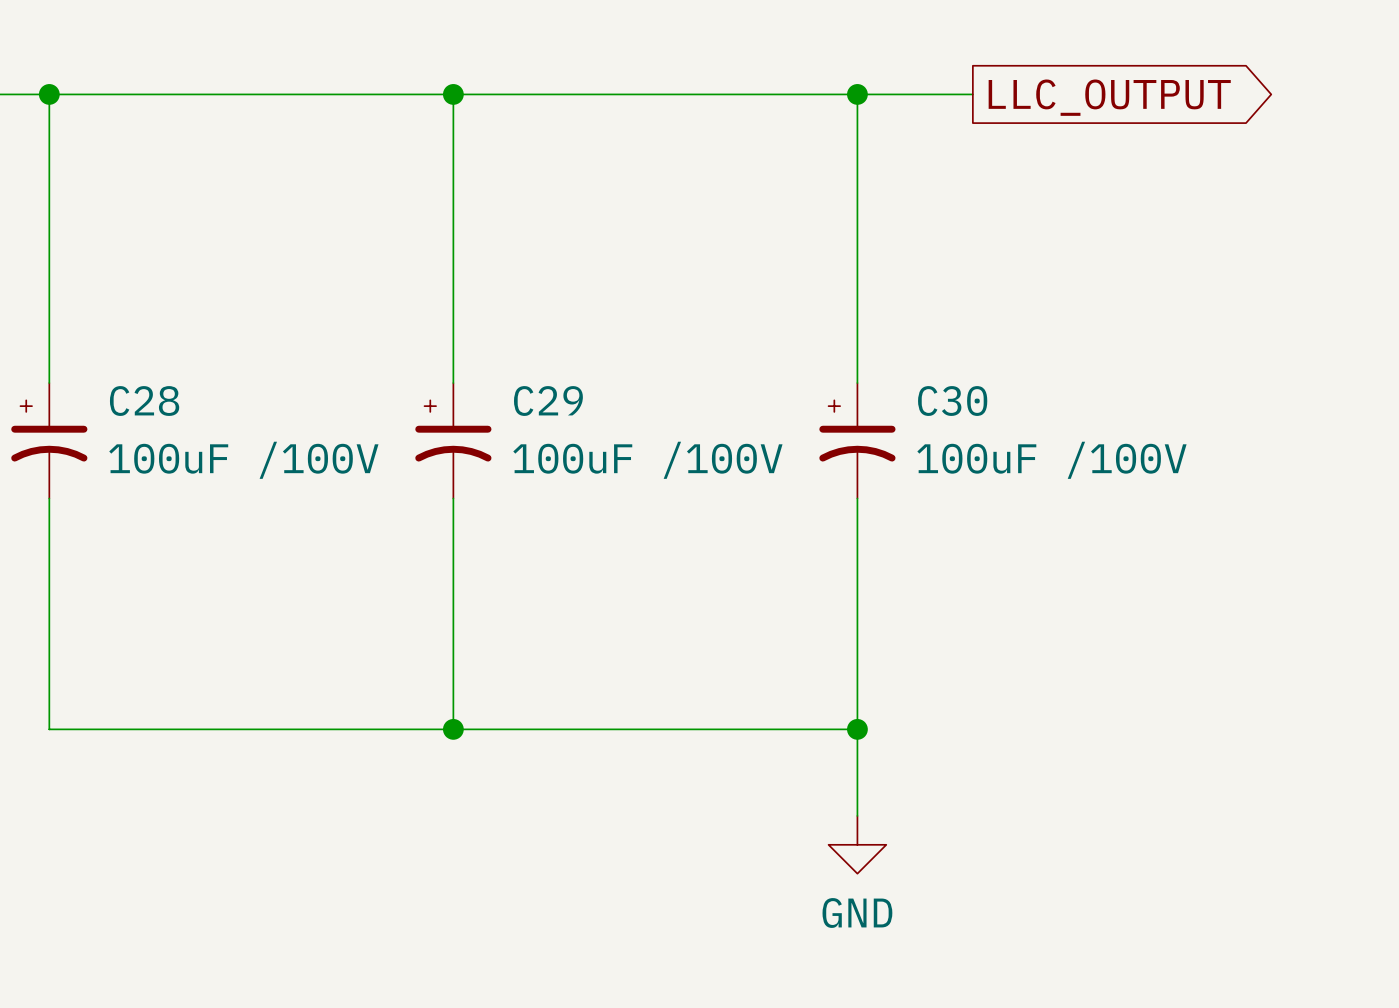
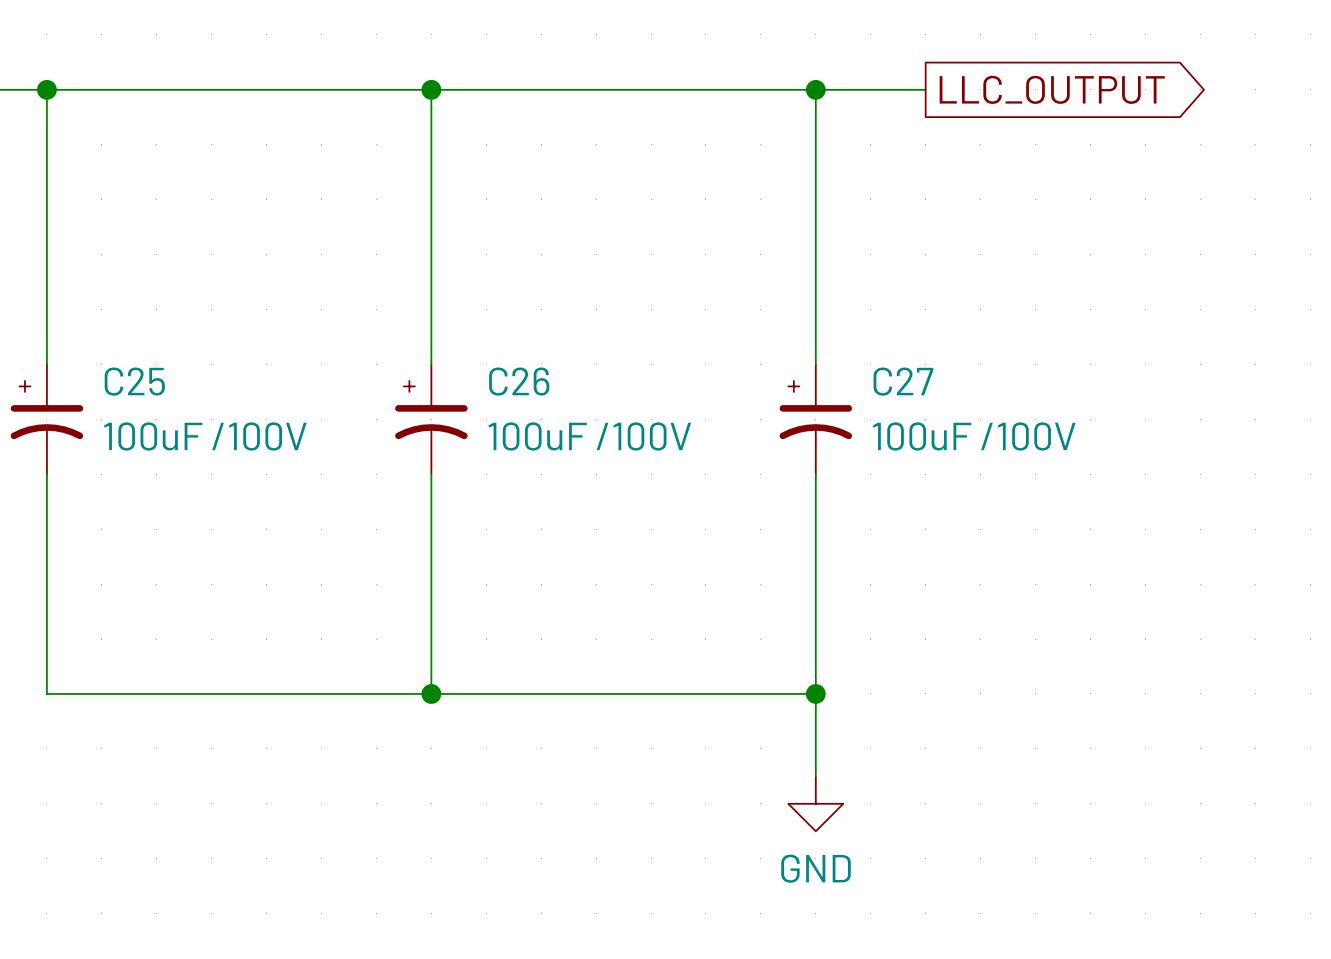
C28 name: C28 (144, 401) -> C25 (134, 381)
C29 name: C29 (548, 401) -> C26 (519, 381)
C30 name: C30 (952, 401) -> C27 (903, 381)

